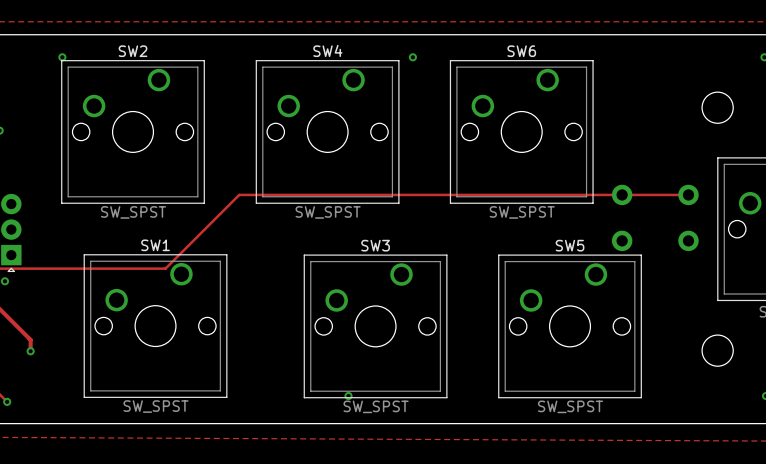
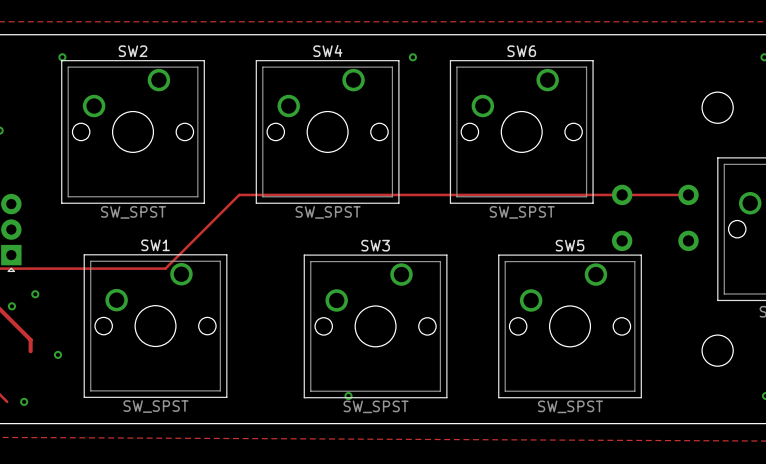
via: (4, 281) -> none
via: none -> (35, 294)
via: none -> (11, 306)
via: (30, 351) -> none
via: none -> (57, 354)
via: (7, 401) -> none
via: none -> (24, 401)

